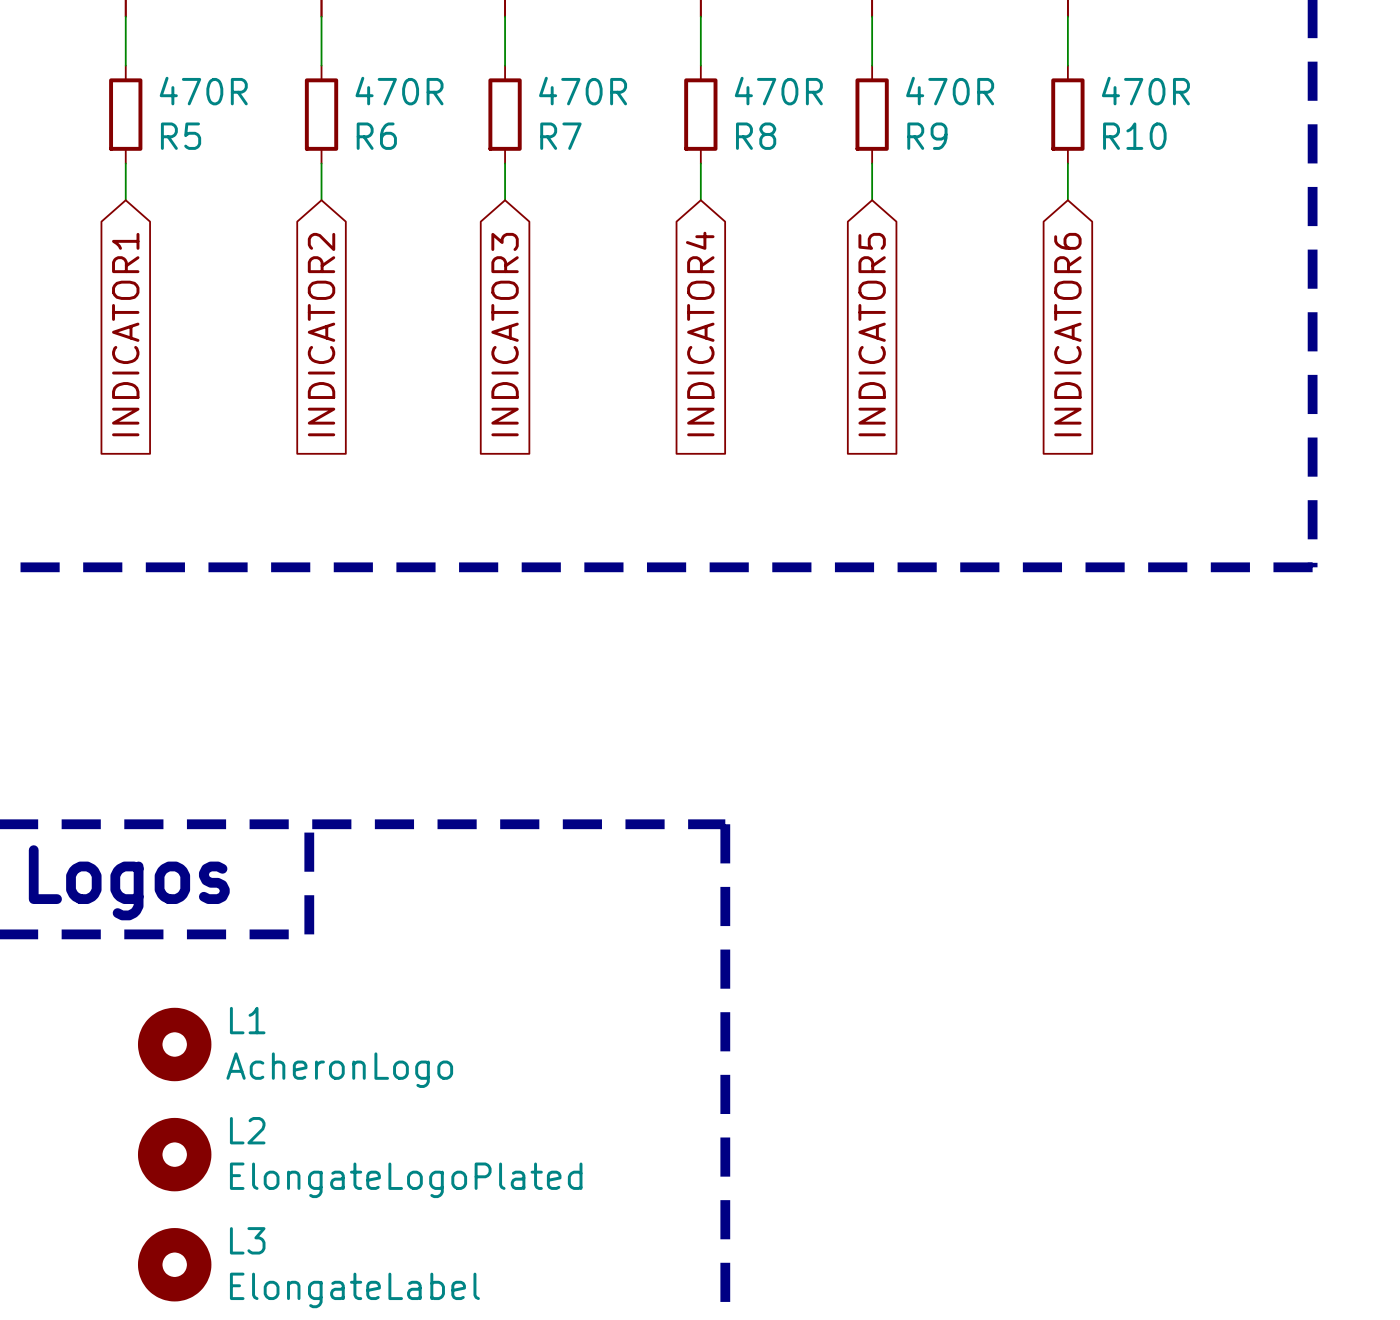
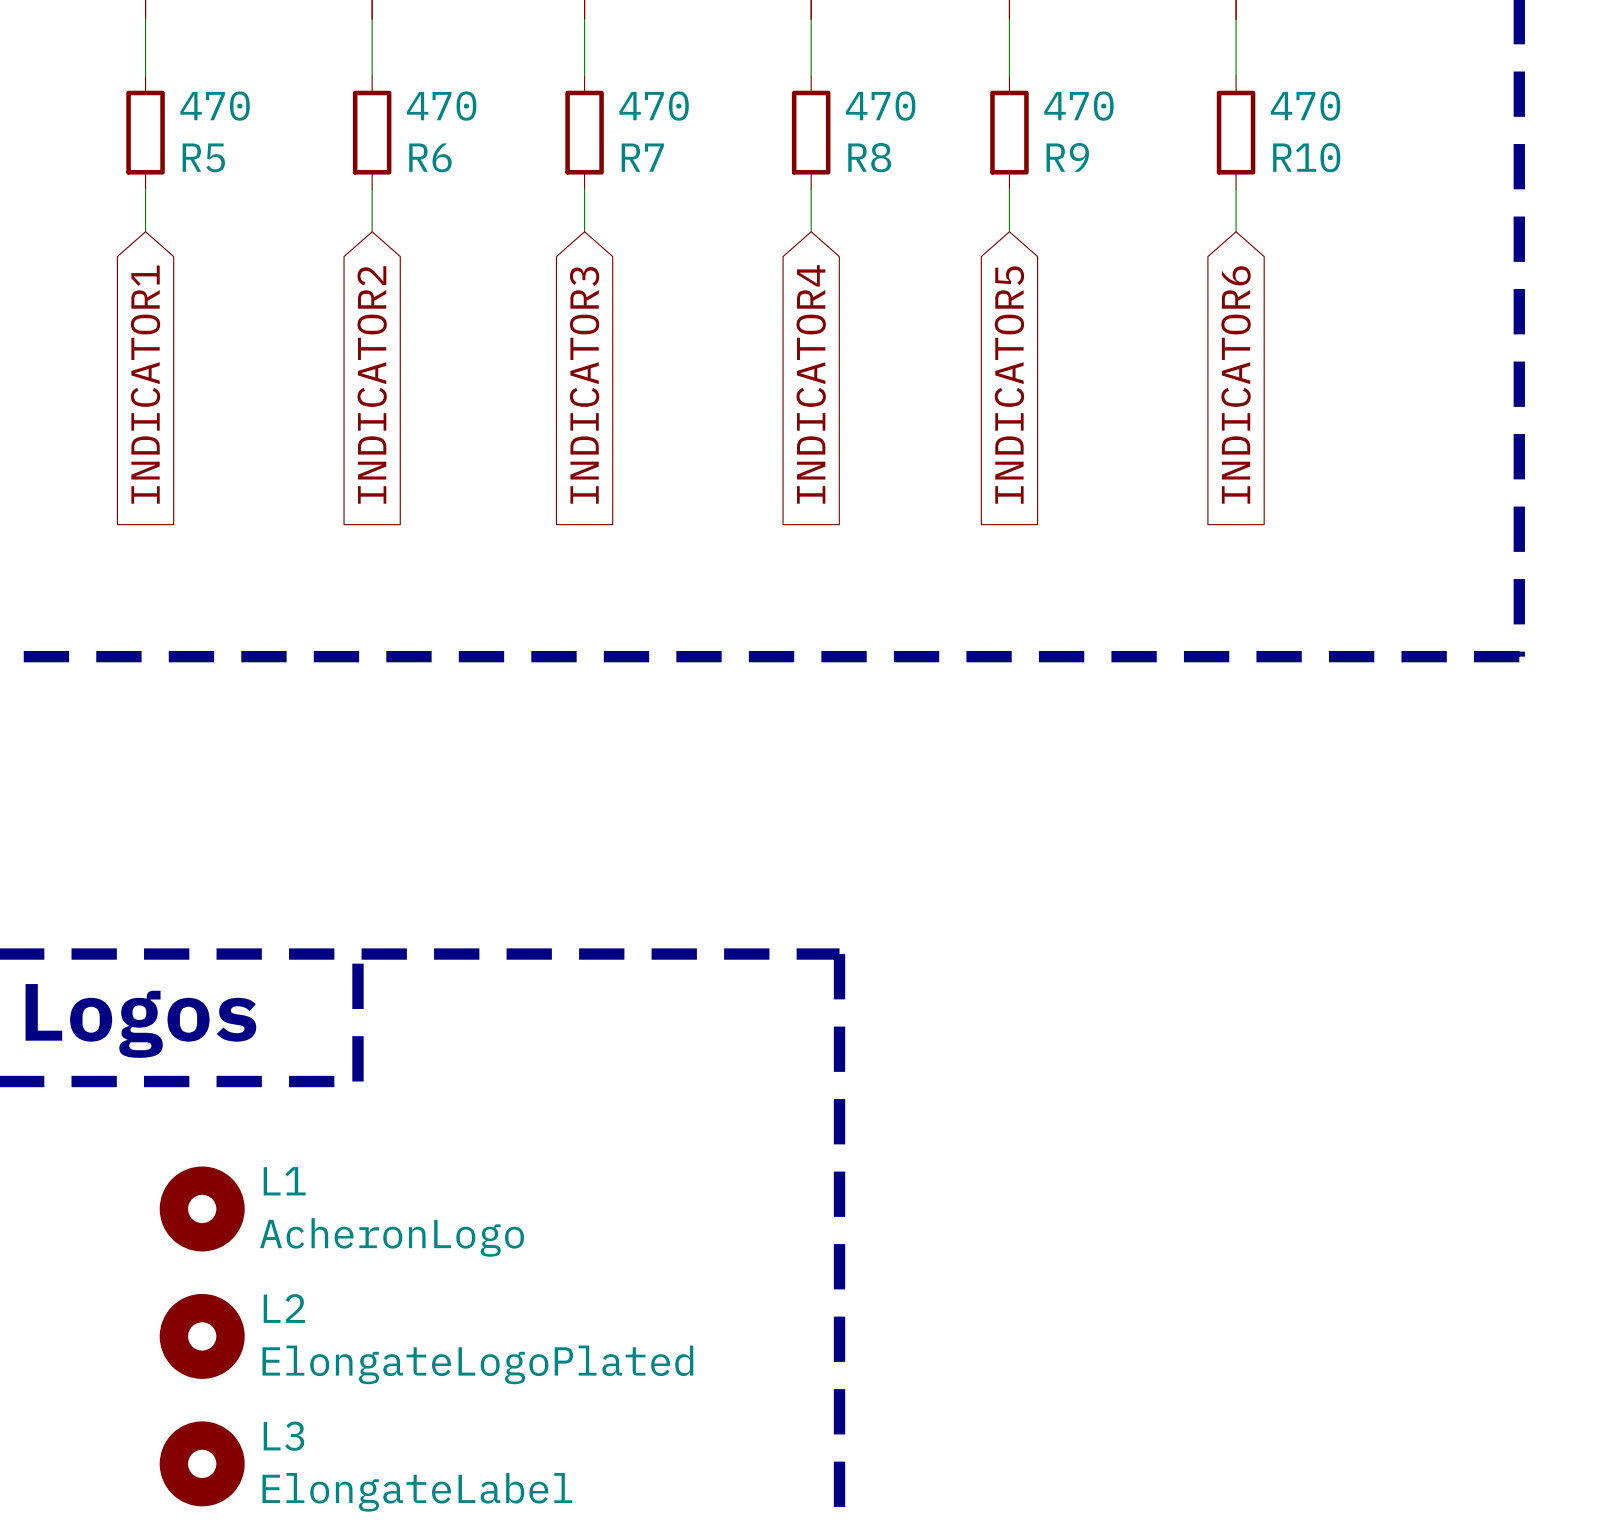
R5 value: 470R (203, 91) -> 470 (215, 106)
R6 value: 470R (399, 91) -> 470 (441, 106)
R7 value: 470R (583, 91) -> 470 (654, 106)
R8 value: 470R (778, 91) -> 470 (880, 106)
R9 value: 470R (950, 91) -> 470 (1078, 106)
R10 value: 470R (1145, 91) -> 470 (1305, 106)

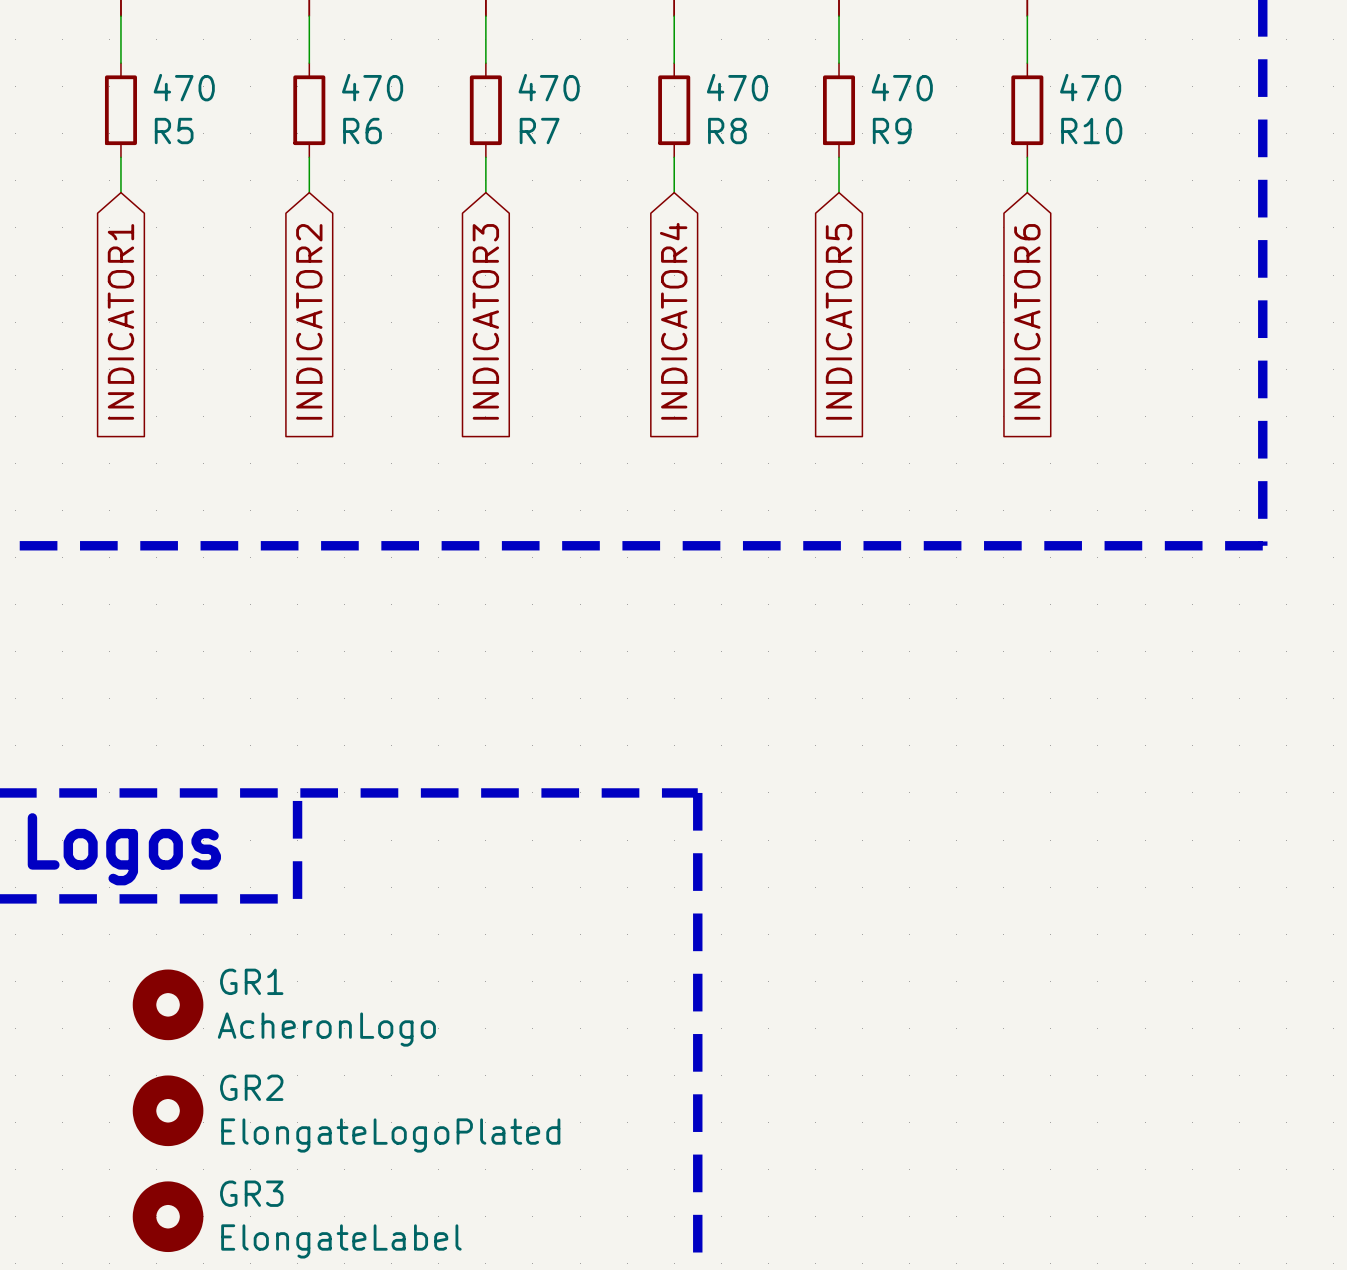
L1 name: L1 (284, 1181) -> GR1 (251, 981)
L2 name: L2 (284, 1308) -> GR2 (251, 1087)
L3 name: L3 (283, 1436) -> GR3 (251, 1193)

